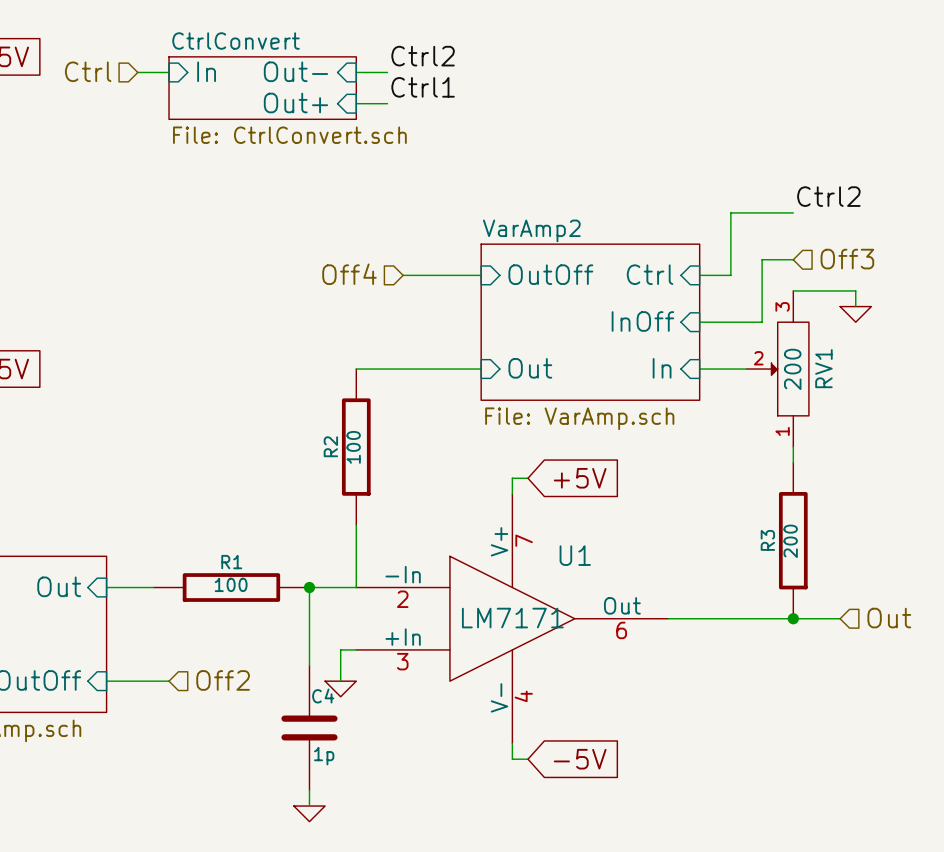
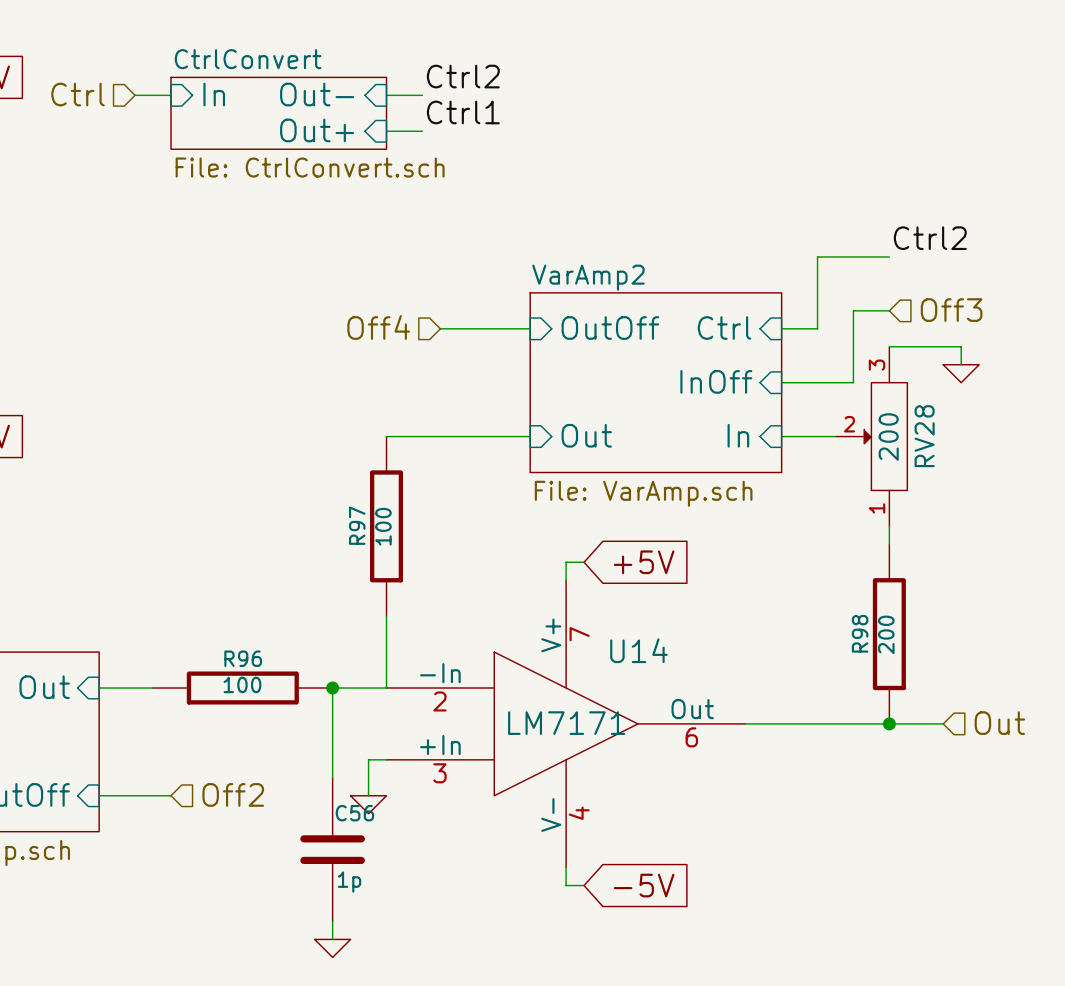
RV1 name: RV1 (823, 368) -> RV28 (924, 436)
R2 name: R2 (330, 446) -> R97 (357, 525)
R3 name: R3 (767, 540) -> R98 (860, 633)
U1 name: U1 (575, 555) -> U14 (638, 650)
R1 name: R1 (231, 562) -> R96 (243, 658)
C4 name: C4 (323, 696) -> C56 (354, 813)

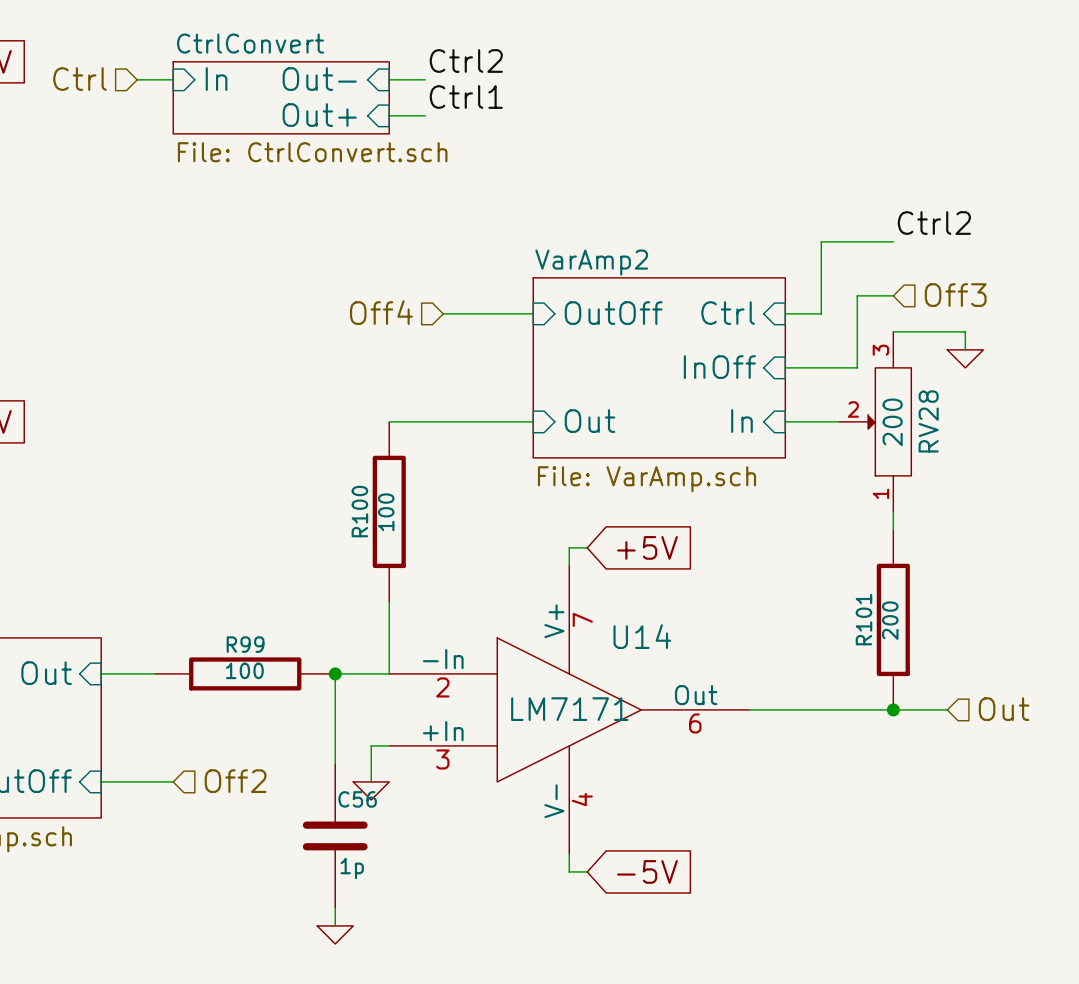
R97 name: R97 (357, 525) -> R100 (359, 511)
R98 name: R98 (860, 633) -> R101 (863, 619)
R96 name: R96 (243, 658) -> R99 (245, 644)

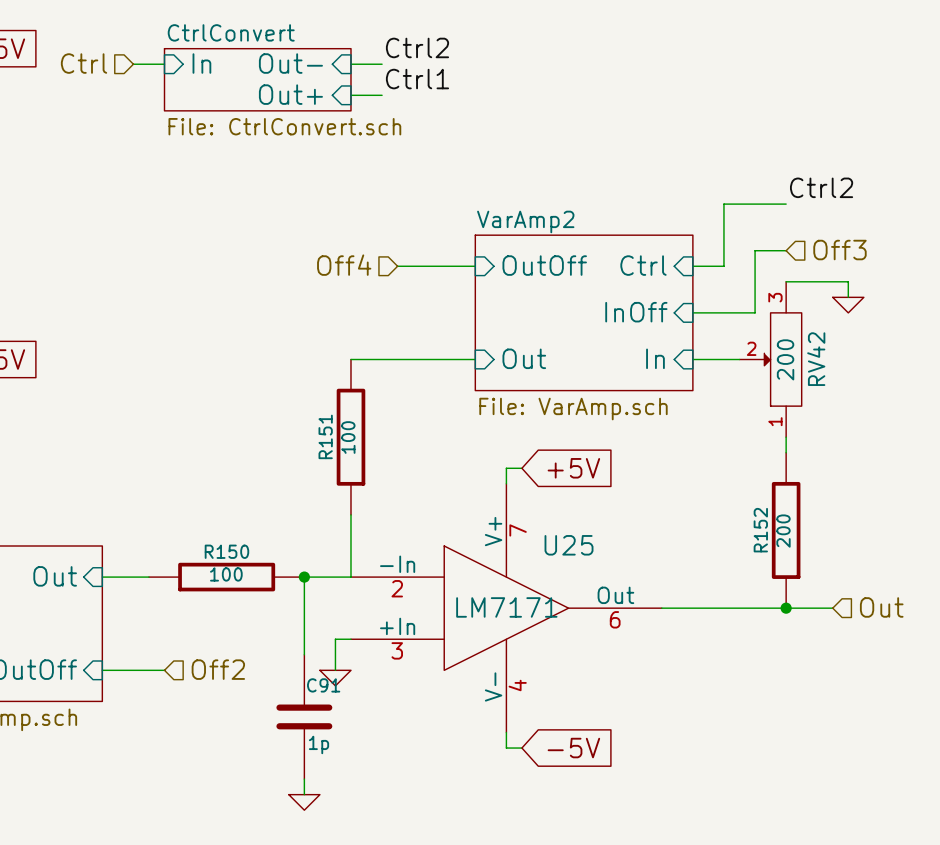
RV28 name: RV28 (928, 421) -> RV42 (816, 359)
R100 name: R100 (359, 511) -> R151 (325, 436)
R101 name: R101 (863, 619) -> R152 (760, 530)
U14 name: U14 (642, 636) -> U25 (569, 545)
R99 name: R99 (245, 644) -> R150 (226, 551)
C56 name: C56 (357, 799) -> C91 (323, 685)

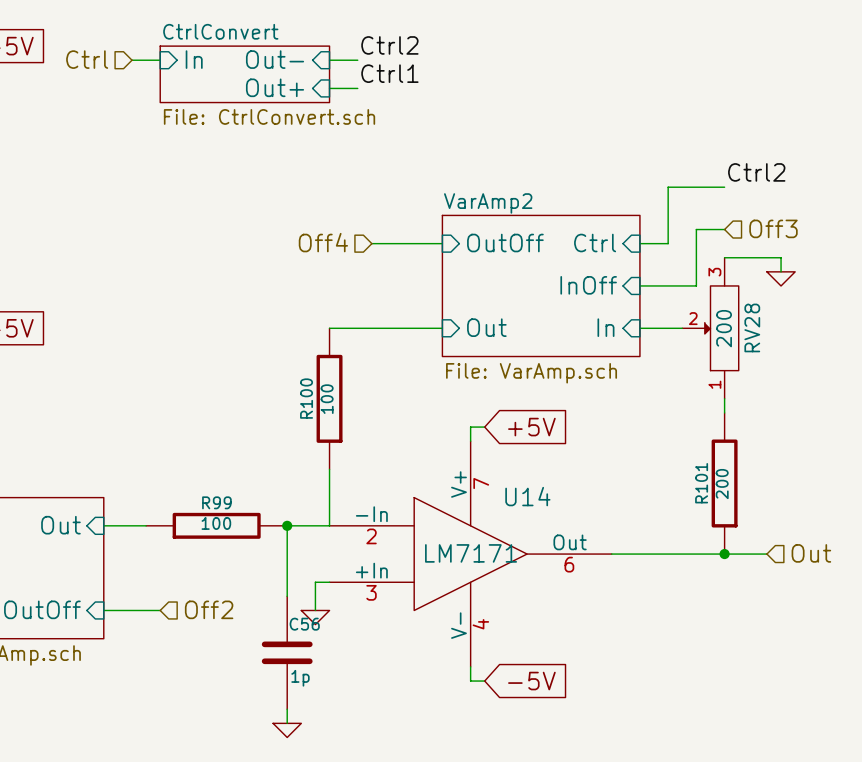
RV42 name: RV42 (816, 359) -> RV28 (752, 327)
R151 name: R151 (325, 436) -> R100 (306, 398)
R152 name: R152 (760, 530) -> R101 (701, 483)
U25 name: U25 (569, 545) -> U14 (527, 496)
R150 name: R150 (226, 551) -> R99 (216, 502)
C91 name: C91 (323, 685) -> C56 (304, 624)

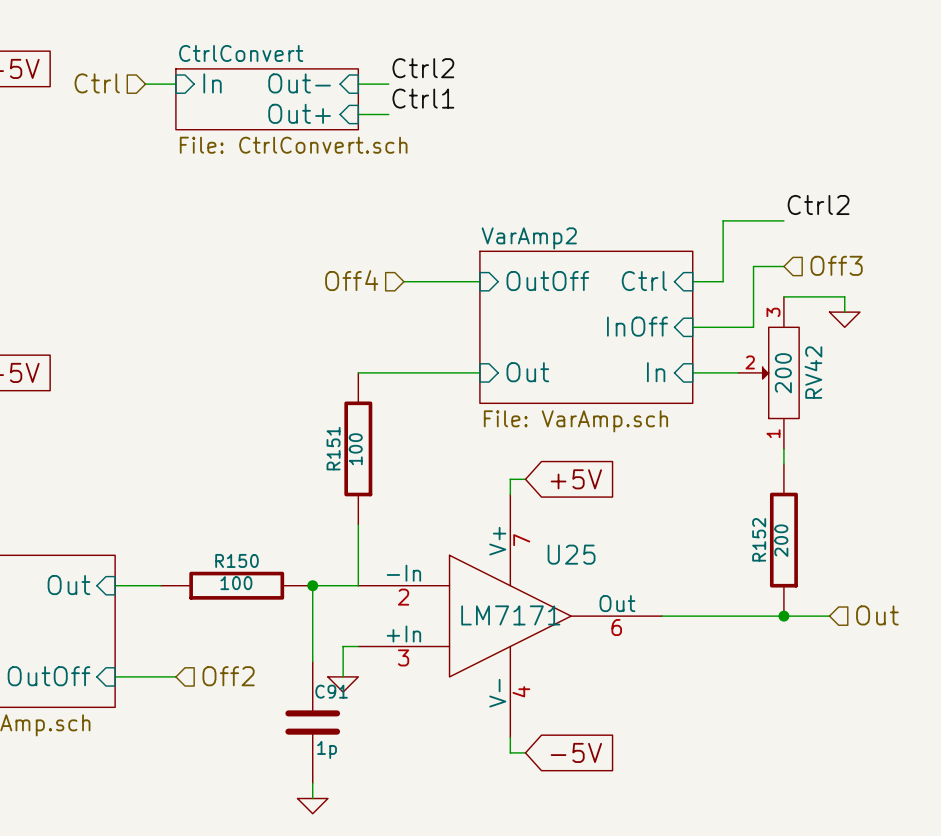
RV28 name: RV28 (752, 327) -> RV42 (813, 372)
R100 name: R100 (306, 398) -> R151 (333, 448)
R101 name: R101 (701, 483) -> R152 (759, 539)
U14 name: U14 (527, 496) -> U25 (571, 554)
R99 name: R99 (216, 502) -> R150 (237, 560)
C56 name: C56 (304, 624) -> C91 (331, 691)

